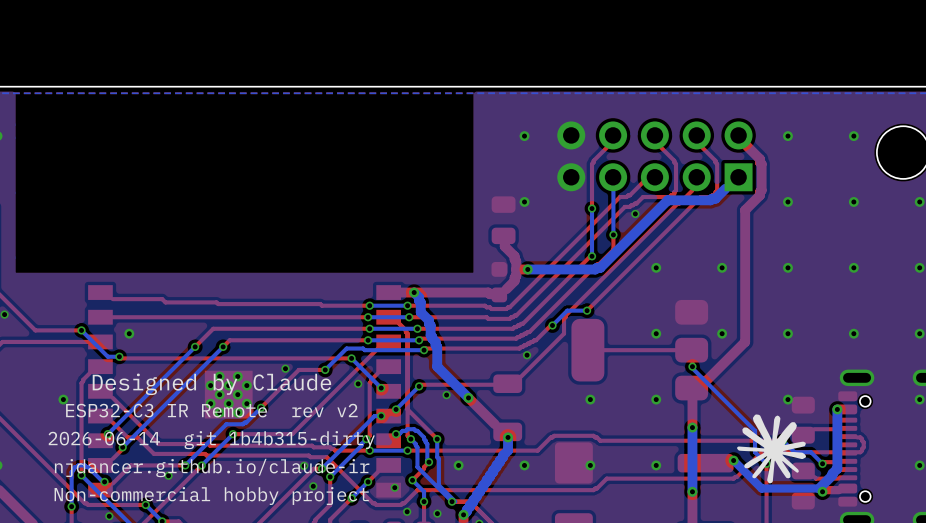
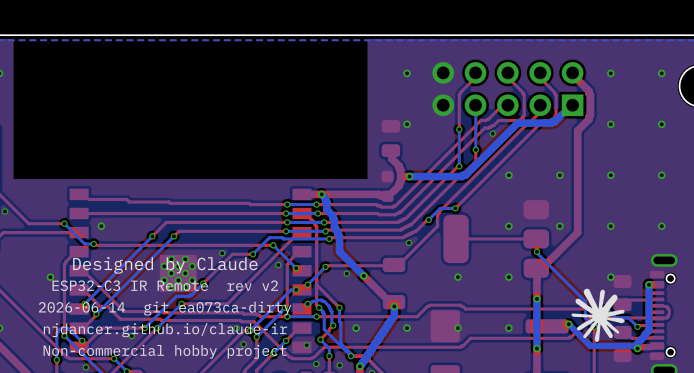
text: 2026-06-14 git 1b4b315-dirty (211, 440) -> 2026-06-14 git ea073ca-dirty (165, 308)

